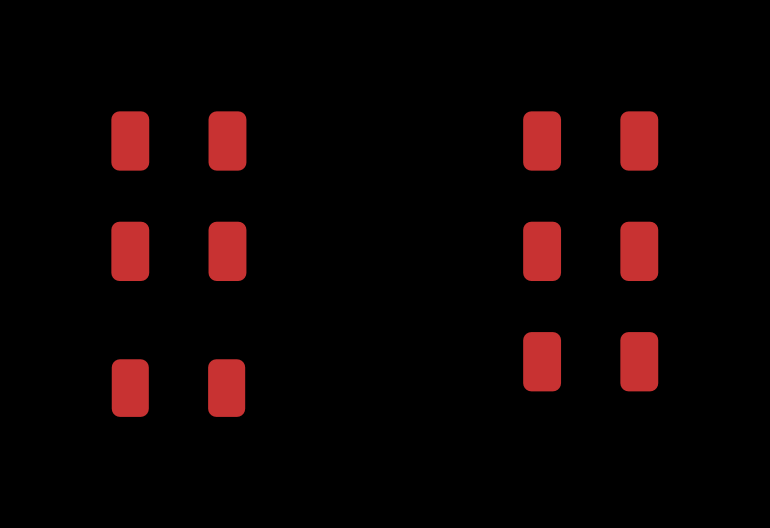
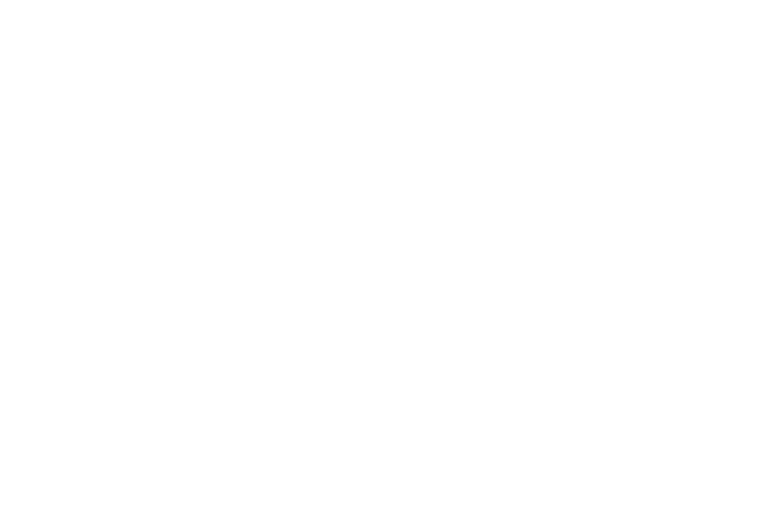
part: (178, 140) -> none
part: (590, 140) -> none
part: (178, 251) -> none
part: (590, 251) -> none
part: (590, 361) -> none
part: (178, 388) -> none

